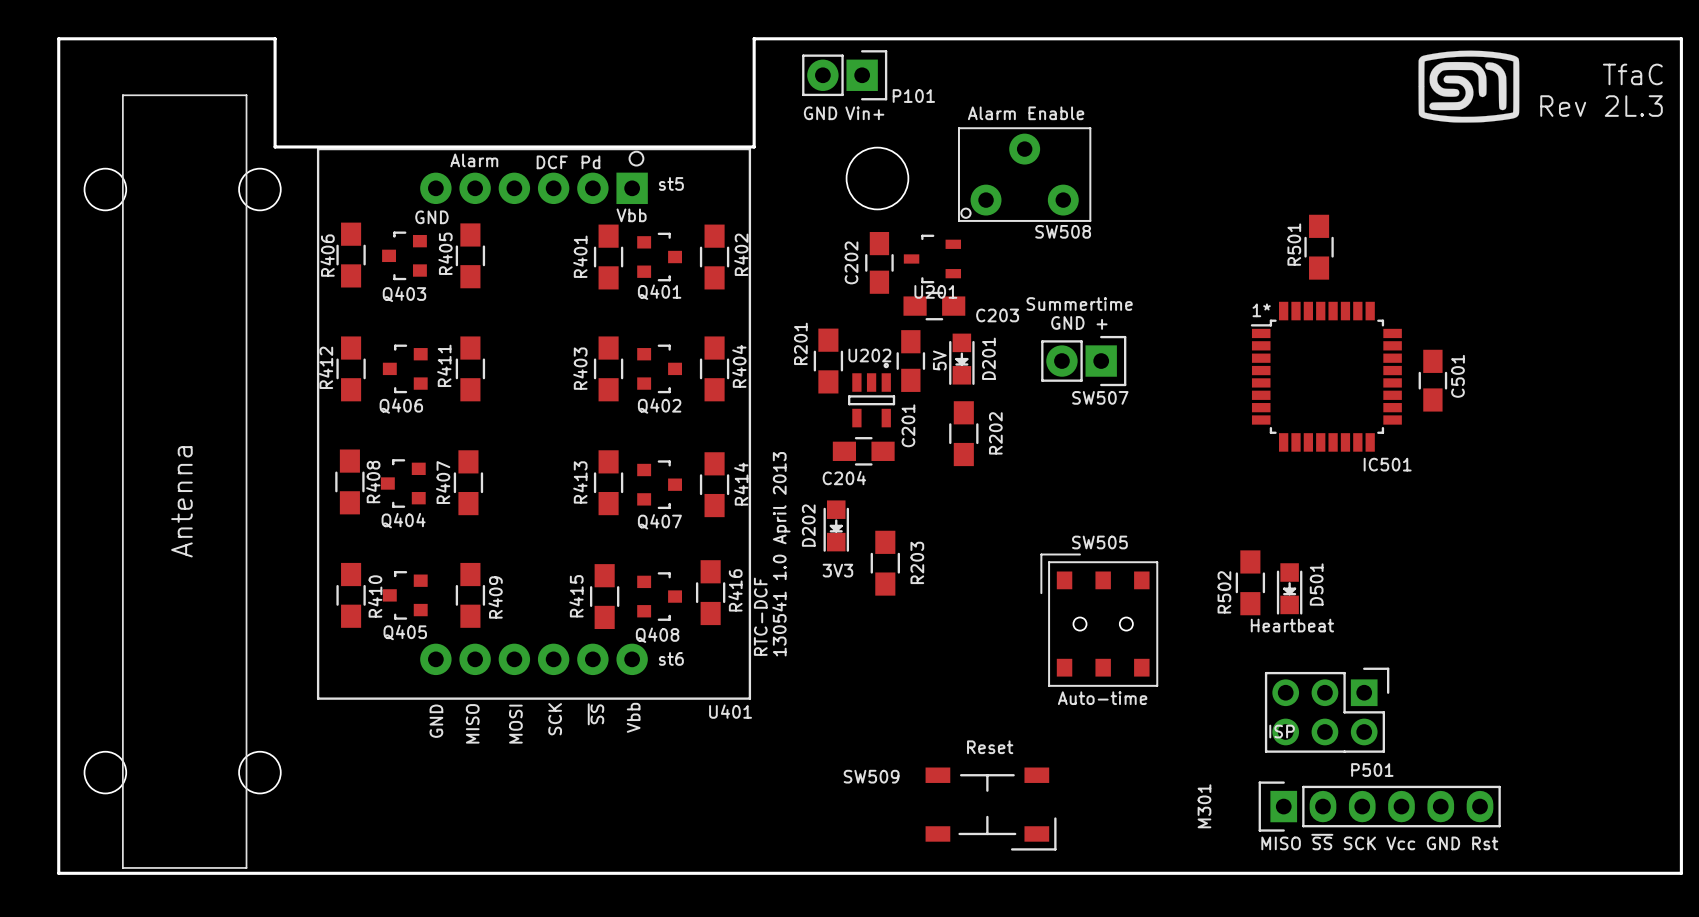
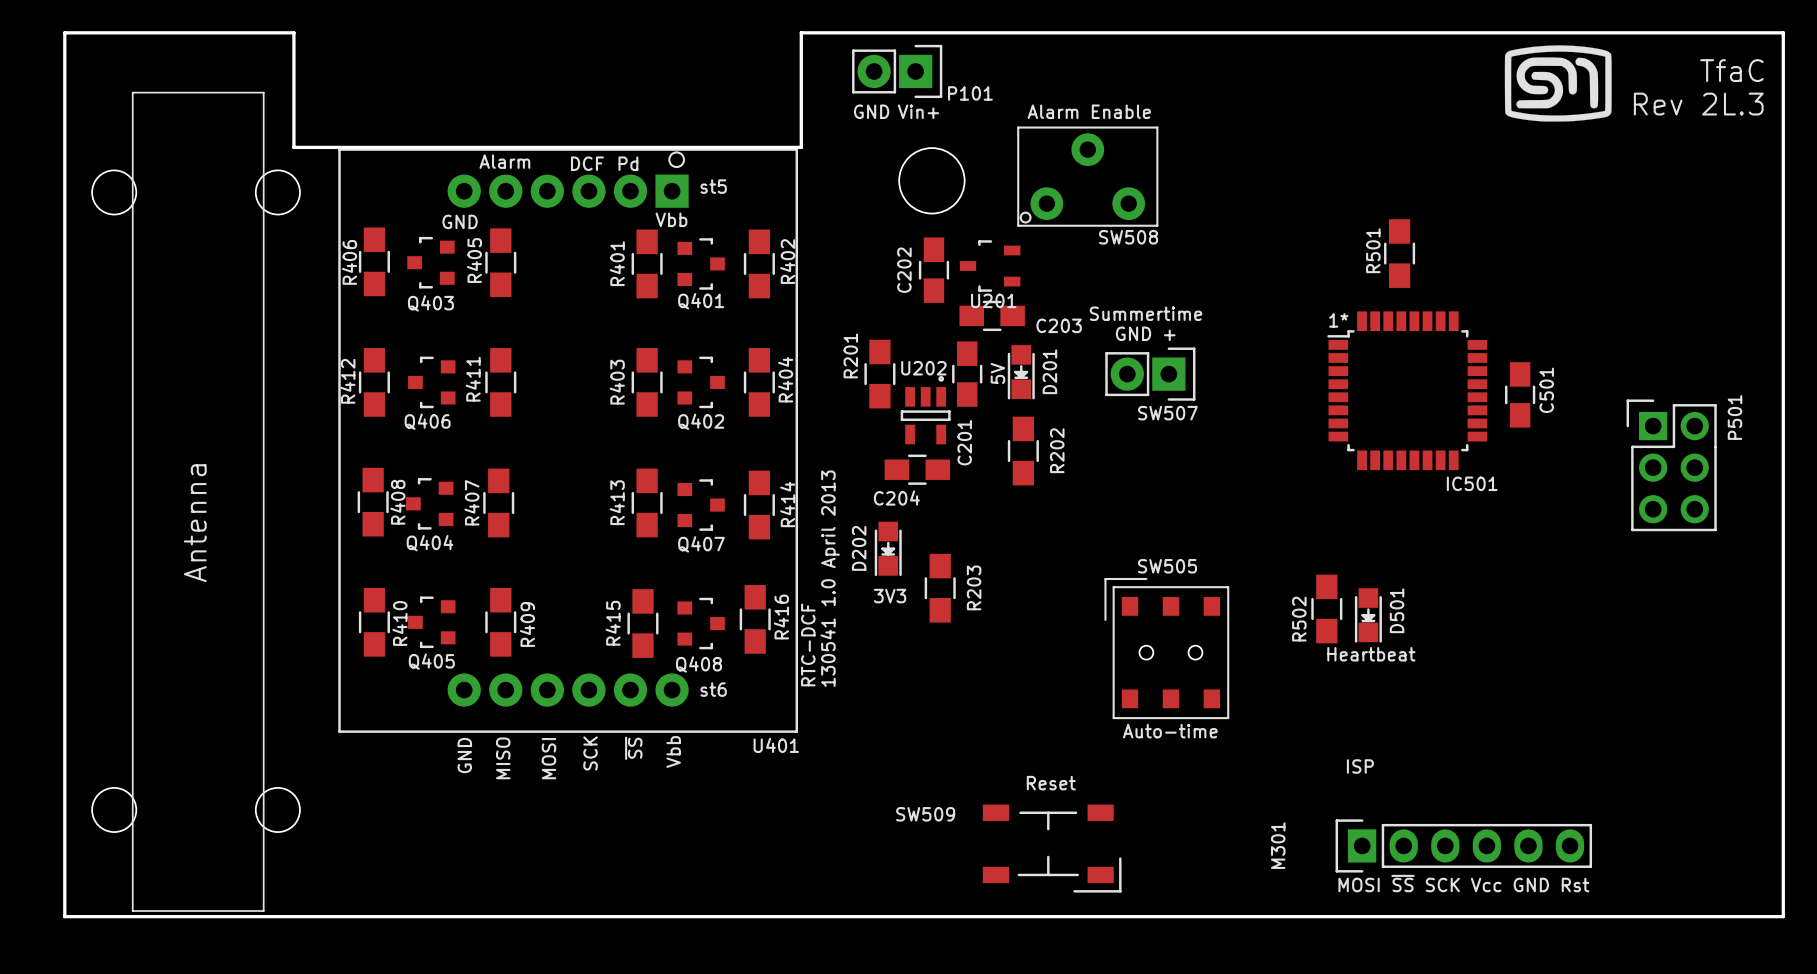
P501 rotation: 0° (1327, 710) -> 90° counterclockwise (1671, 465)
P501 position: (1327, 710) -> (1671, 465)
text: MISO ~{SS} SCK Vcc GND Rst (1379, 842) -> MOSI ~{SS} SCK Vcc GND Rst (1463, 883)

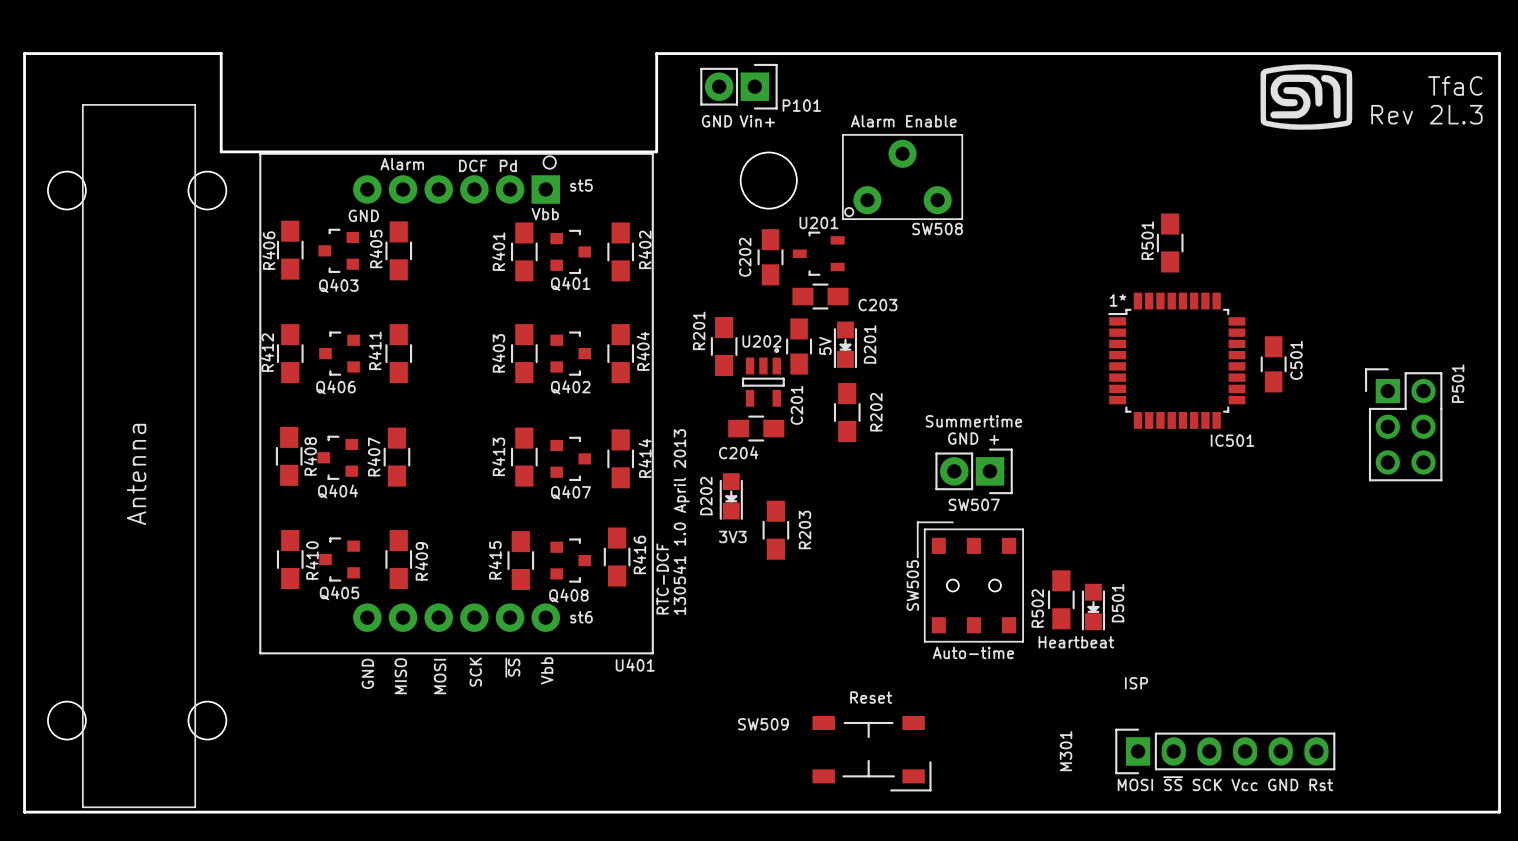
U201 name position: U201 (993, 300) -> U201 (818, 222)
text position: Summertime (1145, 313) -> Summertime (973, 421)
text position: GND + (1145, 333) -> GND + (973, 438)
SW507 position: (1150, 374) -> (974, 471)
SW507 name position: SW507 (1167, 413) -> SW507 (974, 504)
SW505 name rotation: 0° (1167, 566) -> 90° counterclockwise (912, 585)
SW505 name position: SW505 (1167, 566) -> SW505 (912, 585)
R502 position: (1326, 608) -> (1061, 599)
D501 position: (1368, 615) -> (1093, 607)
text position: Heartbeat (1371, 654) -> Heartbeat (1076, 642)

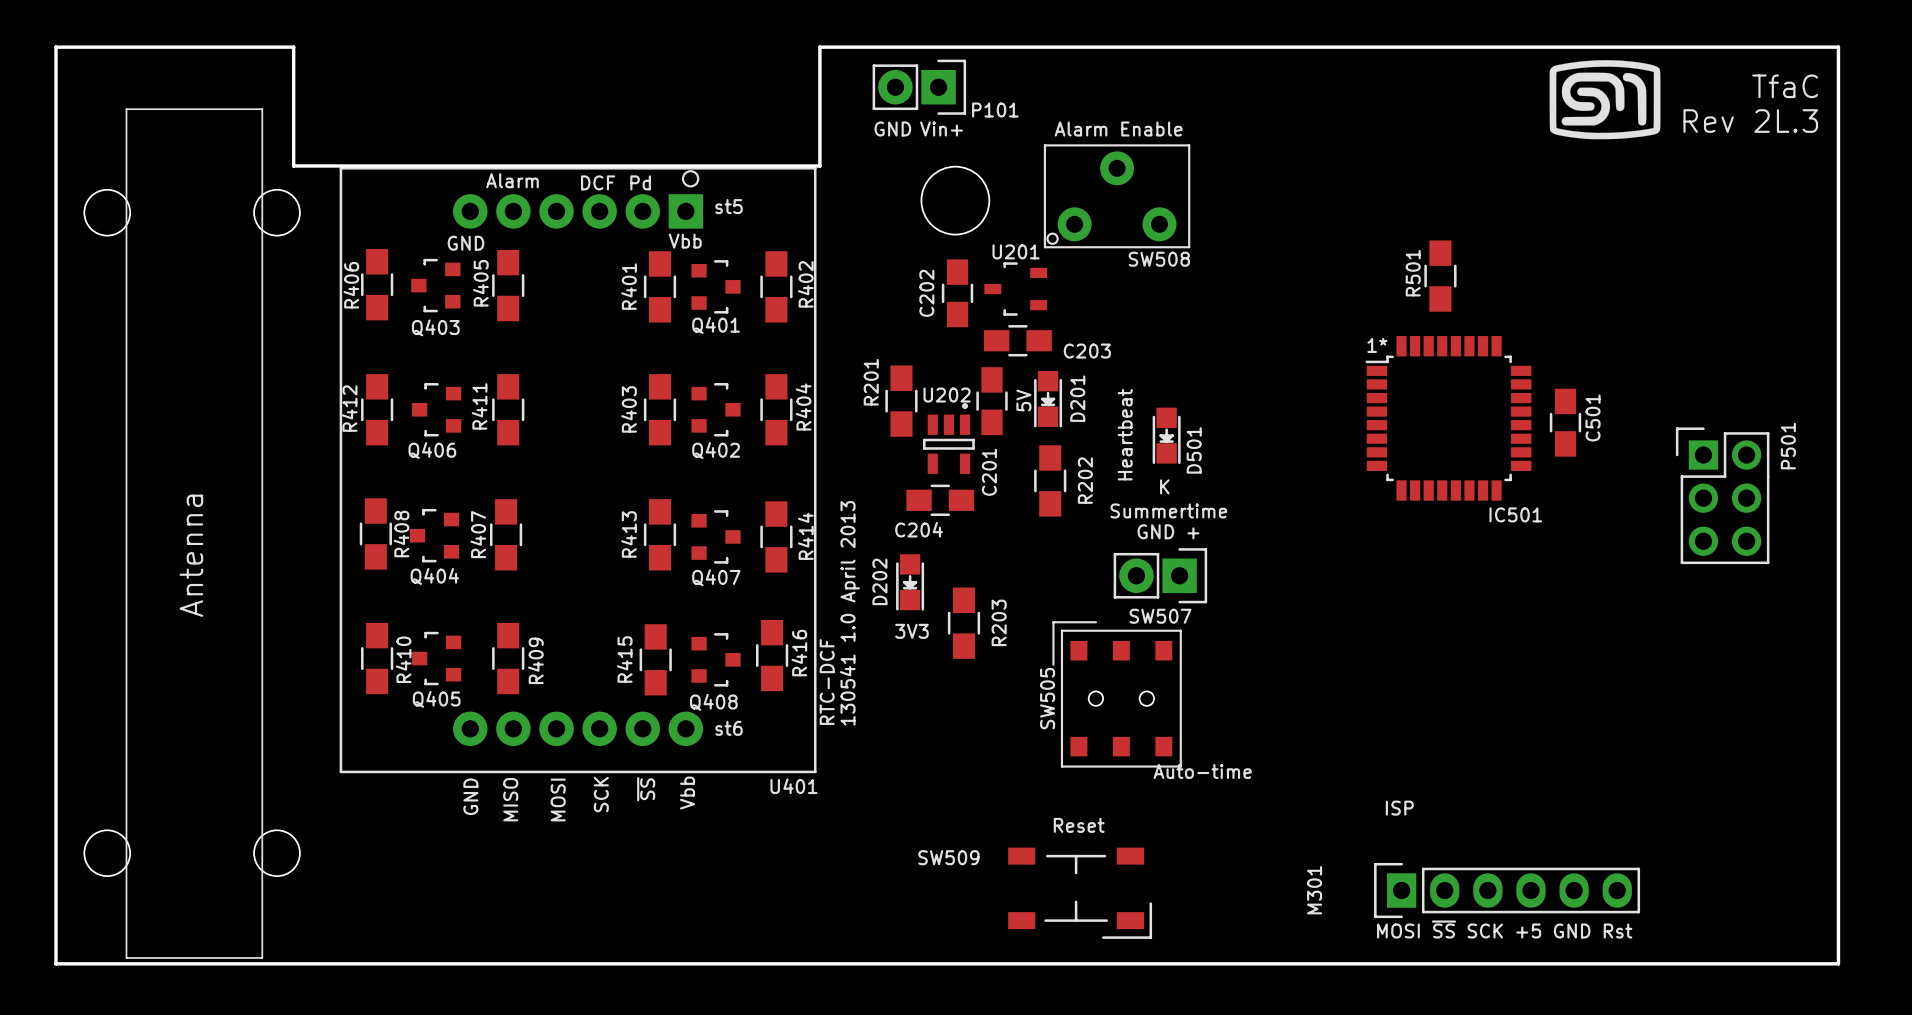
text: none -> K (1164, 486)
text position: Summertime (973, 421) -> Summertime (1168, 510)
text position: GND + (973, 438) -> GND + (1168, 531)
SW507 position: (974, 471) -> (1160, 575)
SW505 position: (970, 582) -> (1117, 694)
R502: (1061, 599) -> none
D501 name position: D501 (1118, 603) -> D501 (1194, 450)
D501 position: (1093, 607) -> (1166, 435)
text rotation: 0° (1076, 642) -> 90° counterclockwise (1125, 434)
text position: Heartbeat (1076, 642) -> Heartbeat (1125, 434)
text: MOSI ~{SS} SCK Vcc GND Rst (1225, 783) -> MOSI ~{SS} SCK +5 GND Rst (1504, 929)

